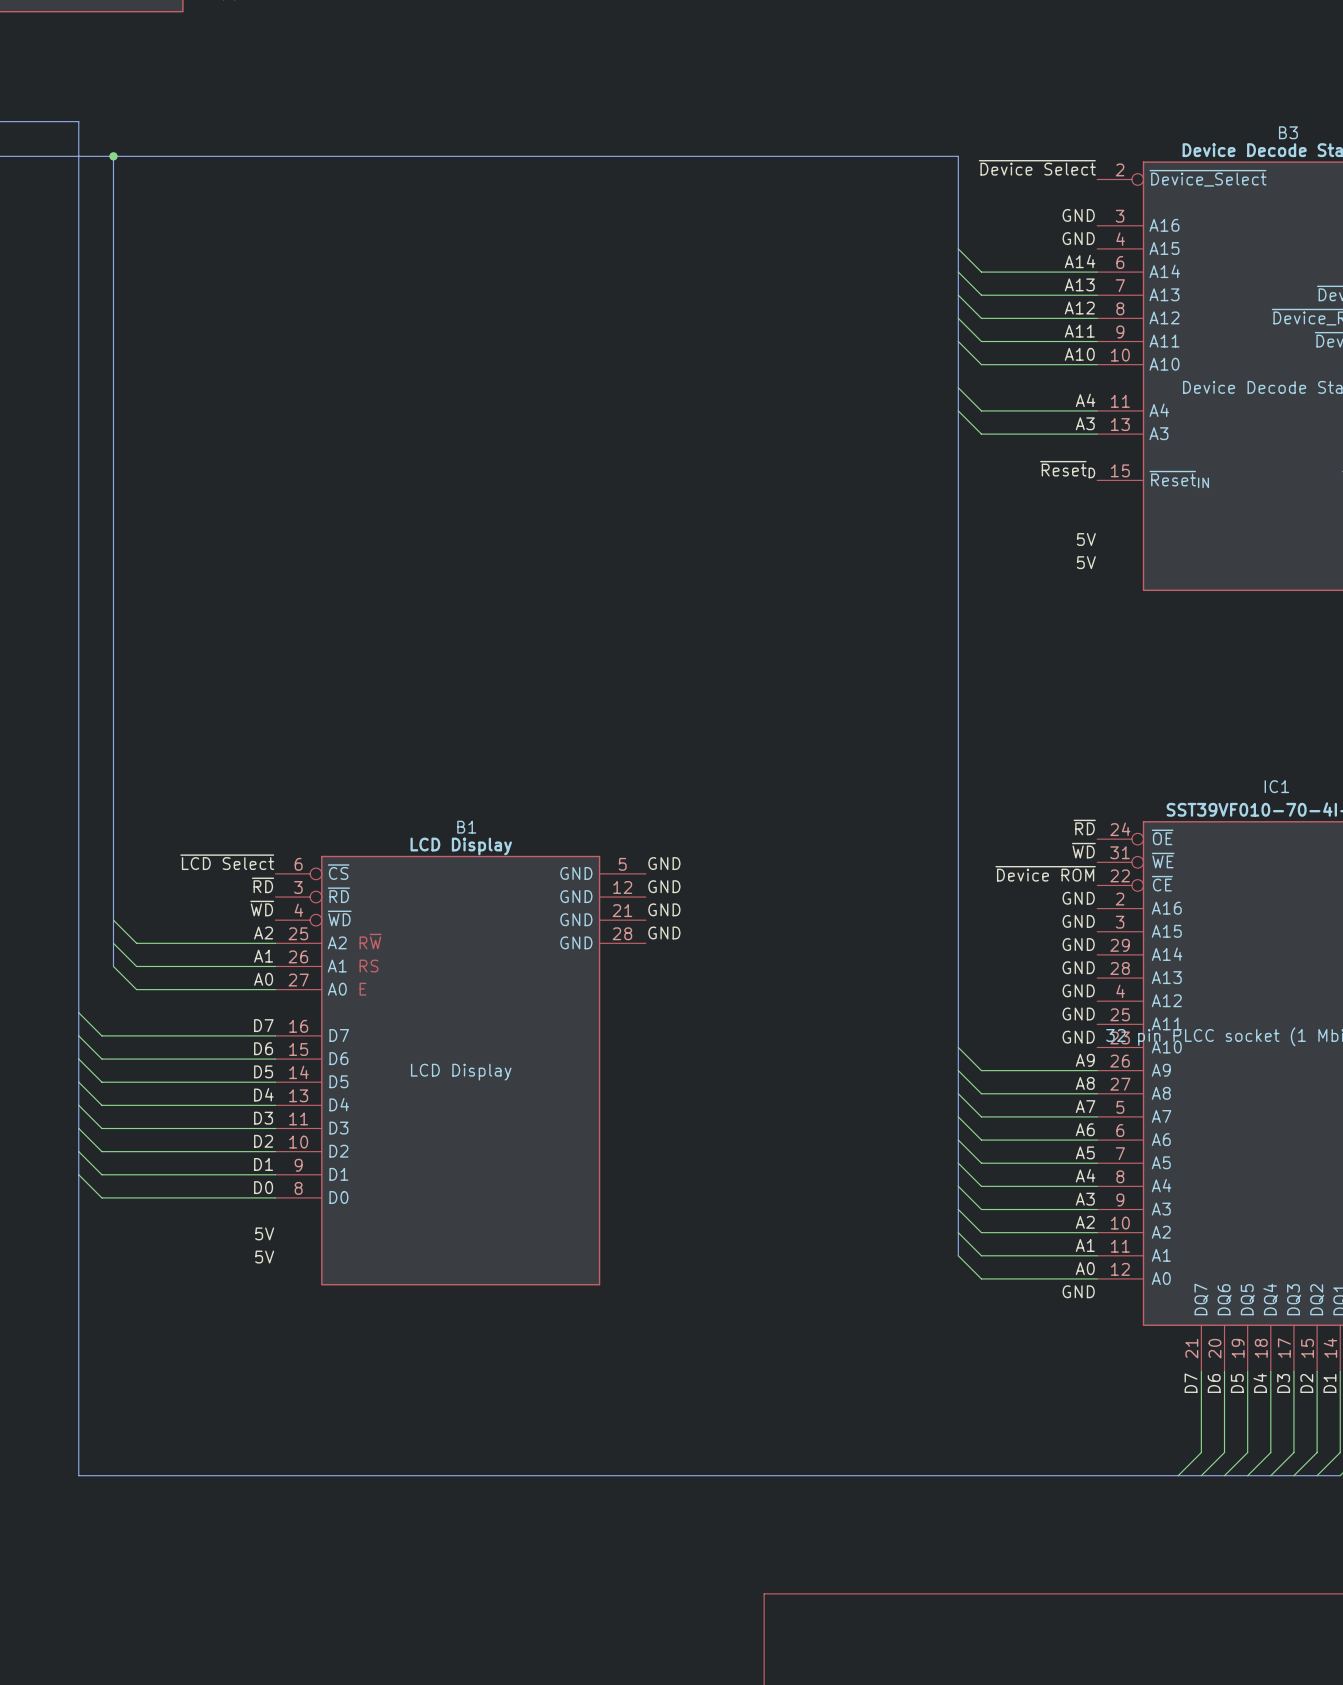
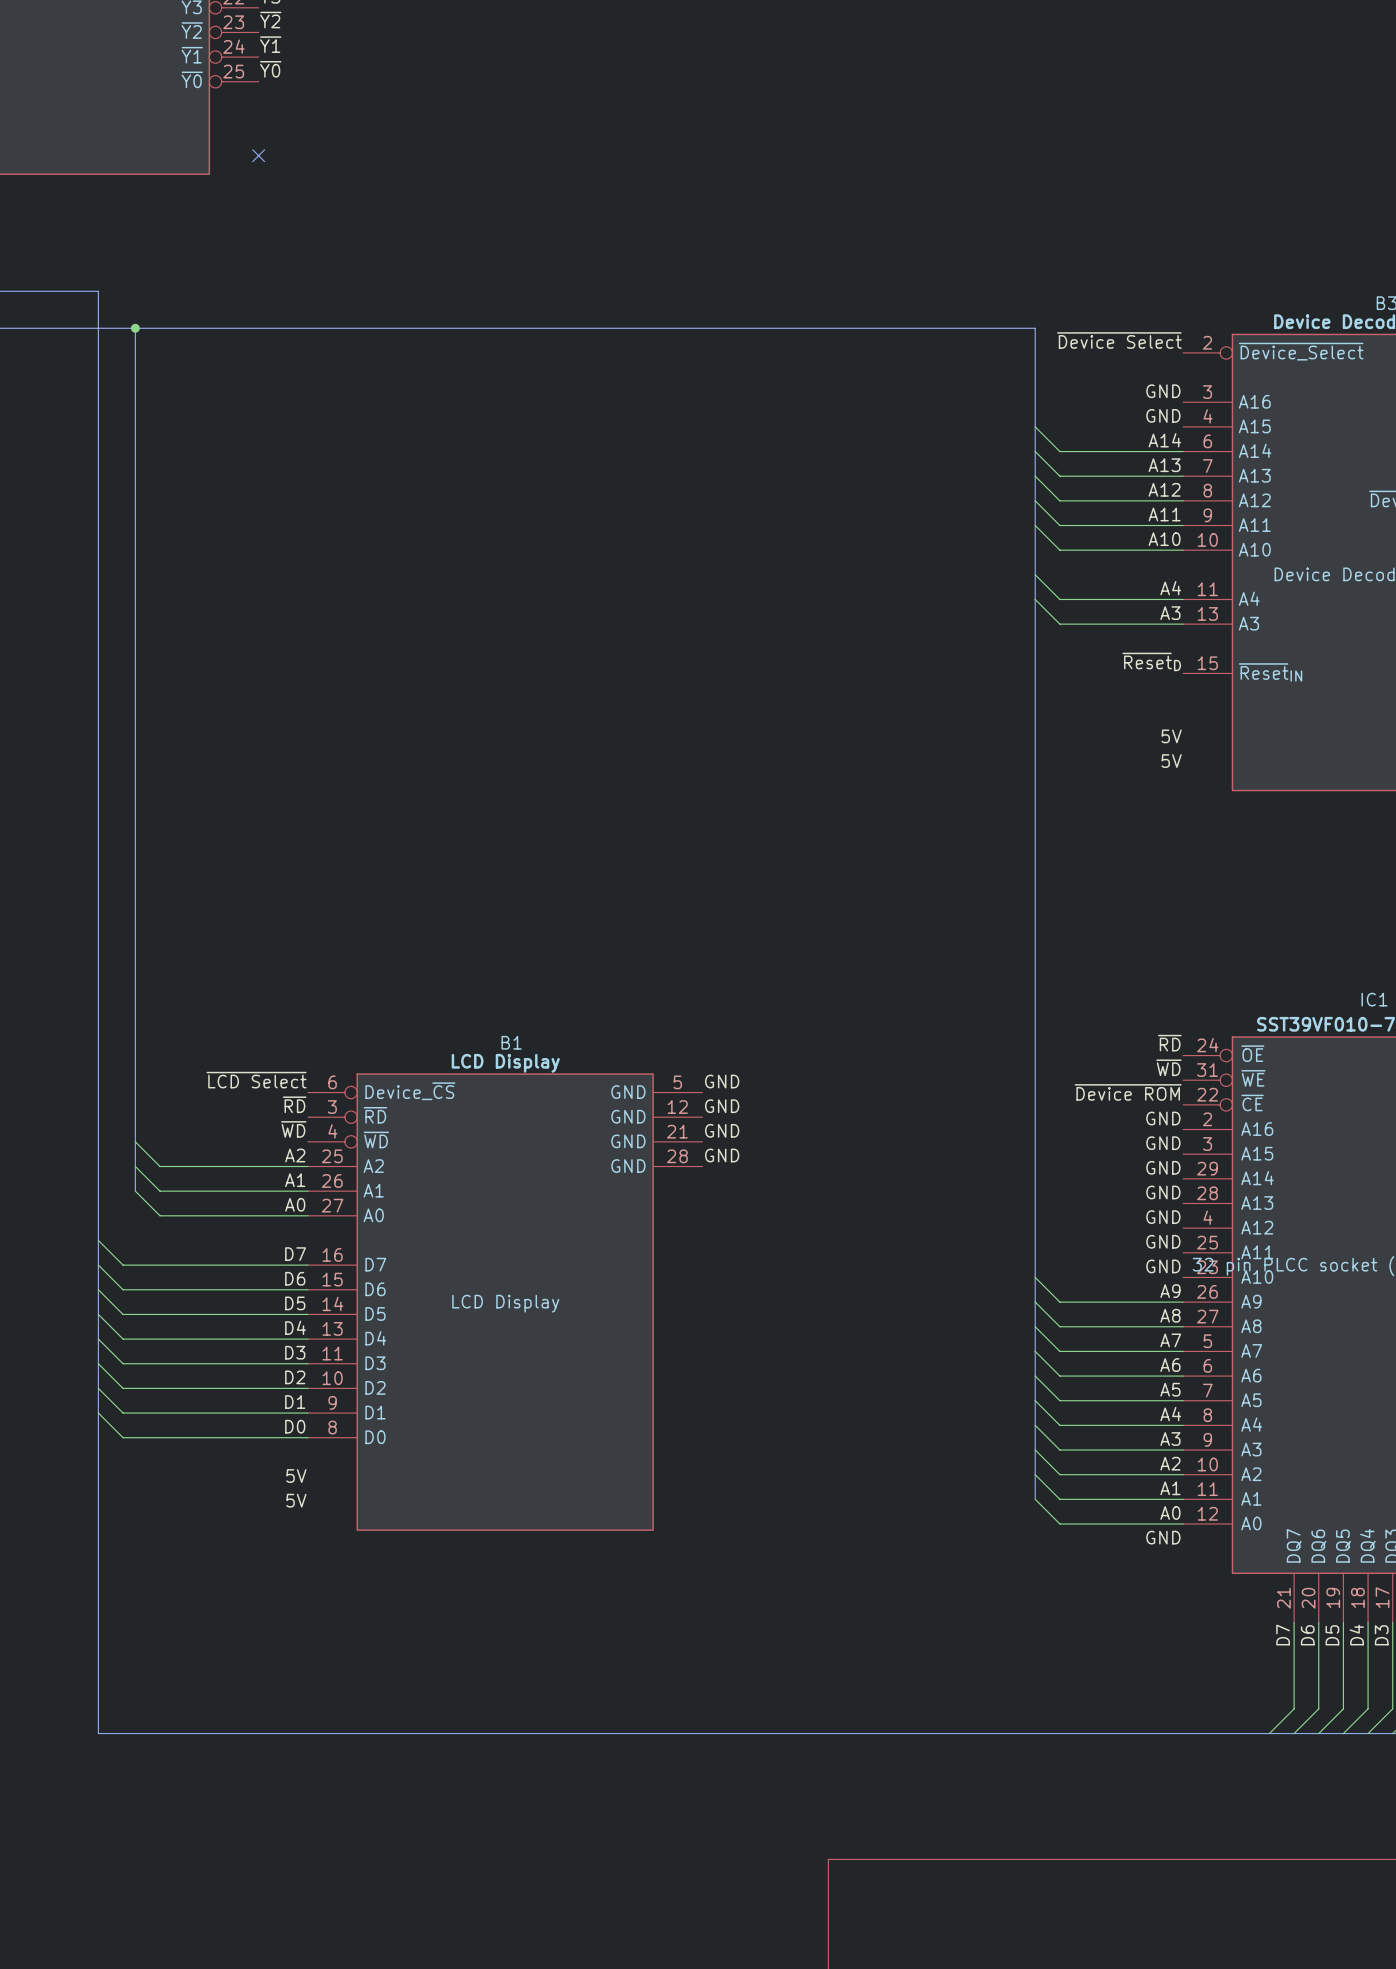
B1 pin name: ~{CS} (338, 872) -> Device_~{CS} (410, 1091)
B1 text: R~{W} (370, 941) -> none
B1 text: RS (369, 966) -> none
B1 text: E (362, 989) -> none

